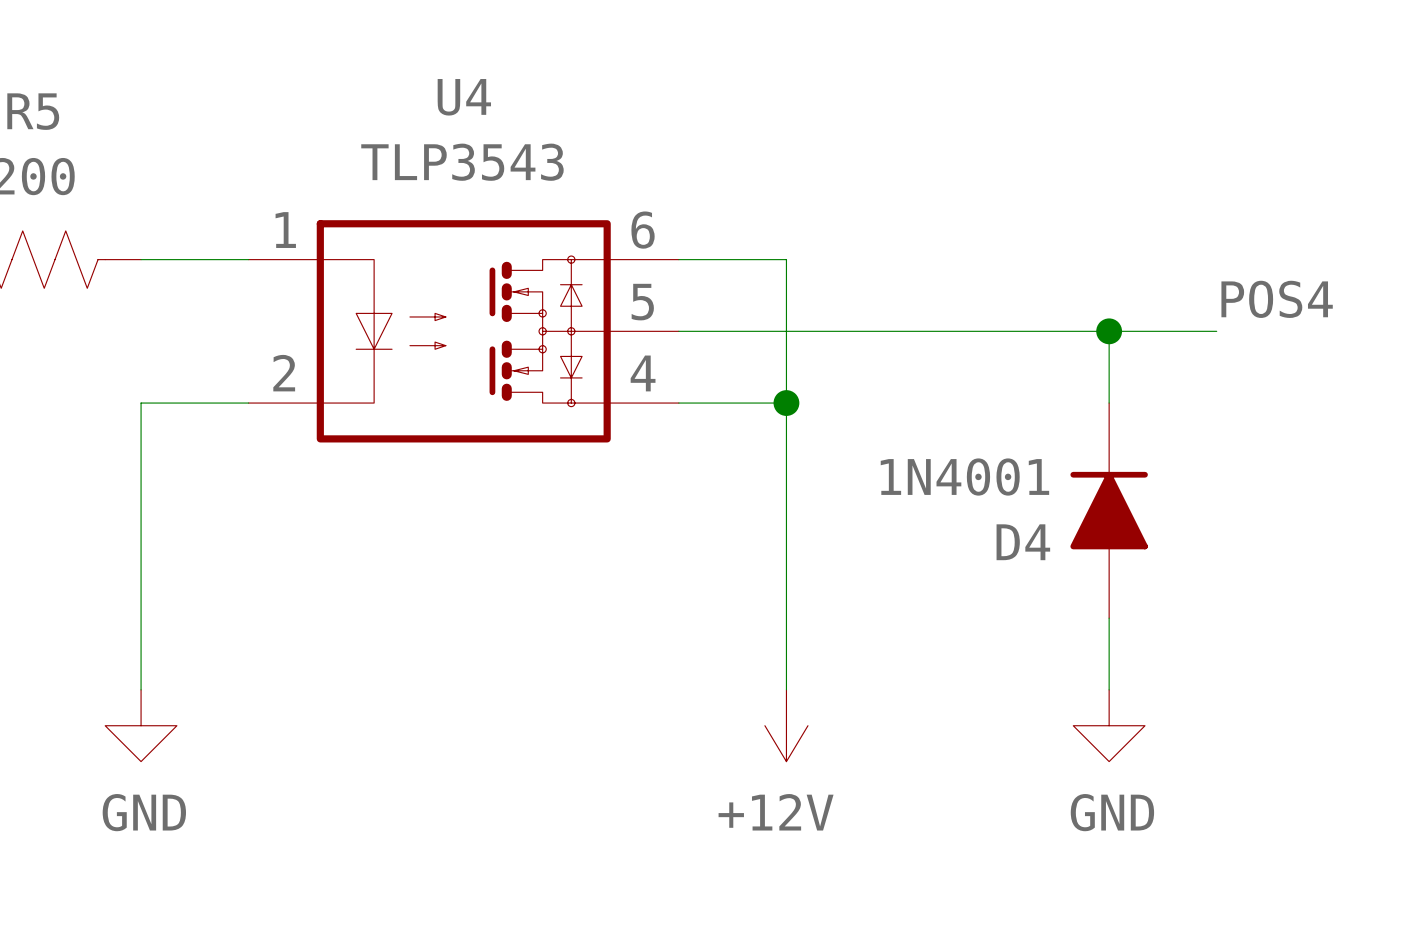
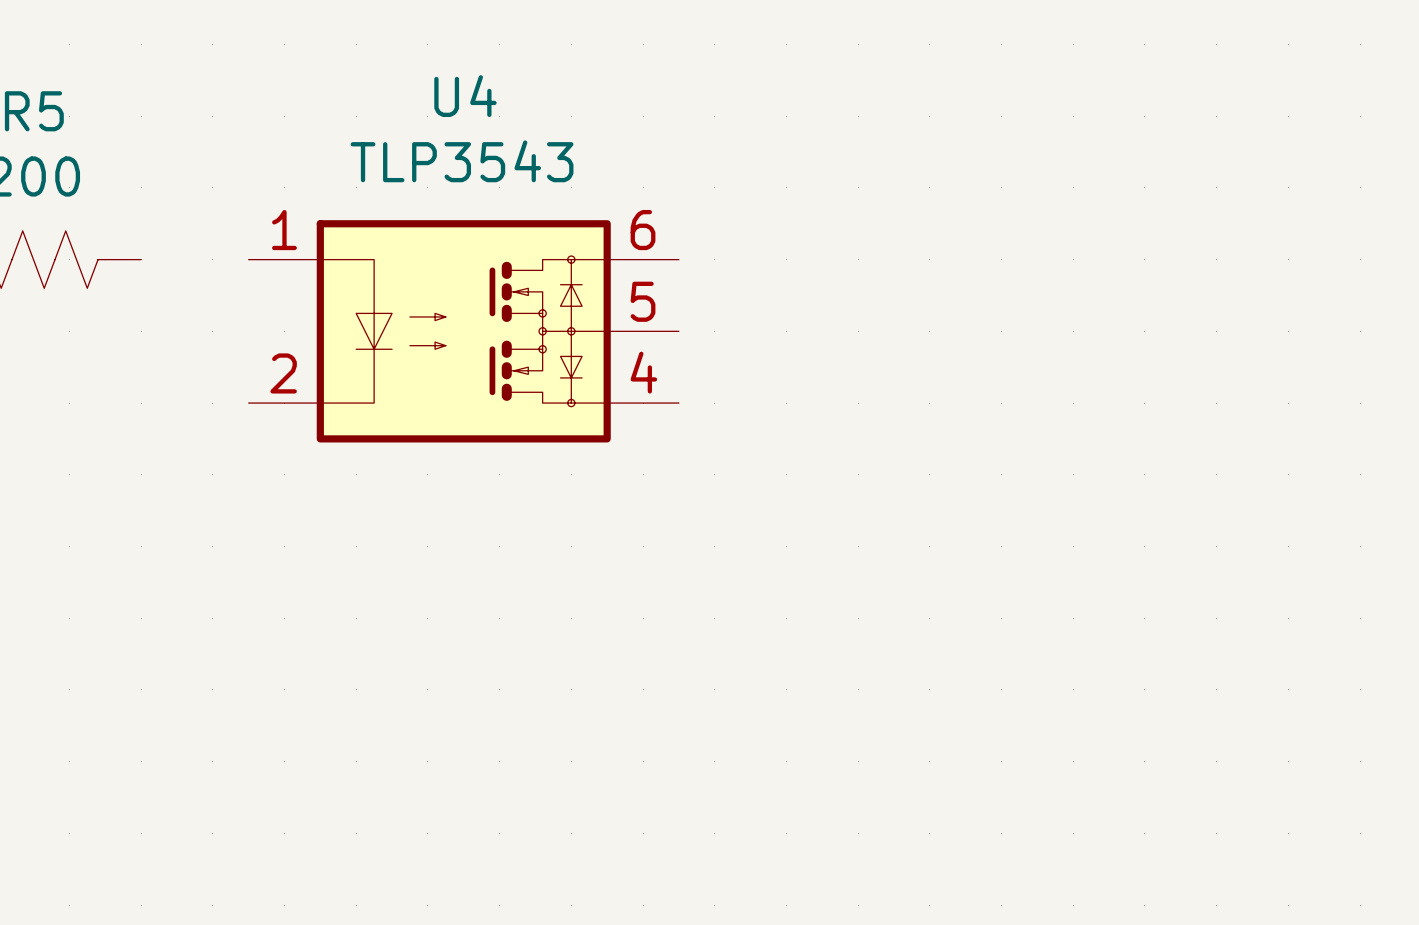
wire: (141, 259) (248, 259) -> none
wire: (678, 259) (786, 259) (786, 689) -> none
label: POS4 (1277, 299) -> none
wire: (678, 331) (1216, 331) -> none
wire: (1109, 331) (1109, 403) -> none
junction: (1109, 331) -> none
wire: (248, 403) (141, 403) (141, 689) -> none
wire: (678, 403) (786, 403) -> none
junction: (786, 403) -> none
D4: 1N4001 (1109, 510) -> none
wire: (1109, 618) (1109, 689) -> none
power symbol: GND (141, 725) -> none
power symbol: +12V (786, 725) -> none
power symbol: GND (1109, 725) -> none

